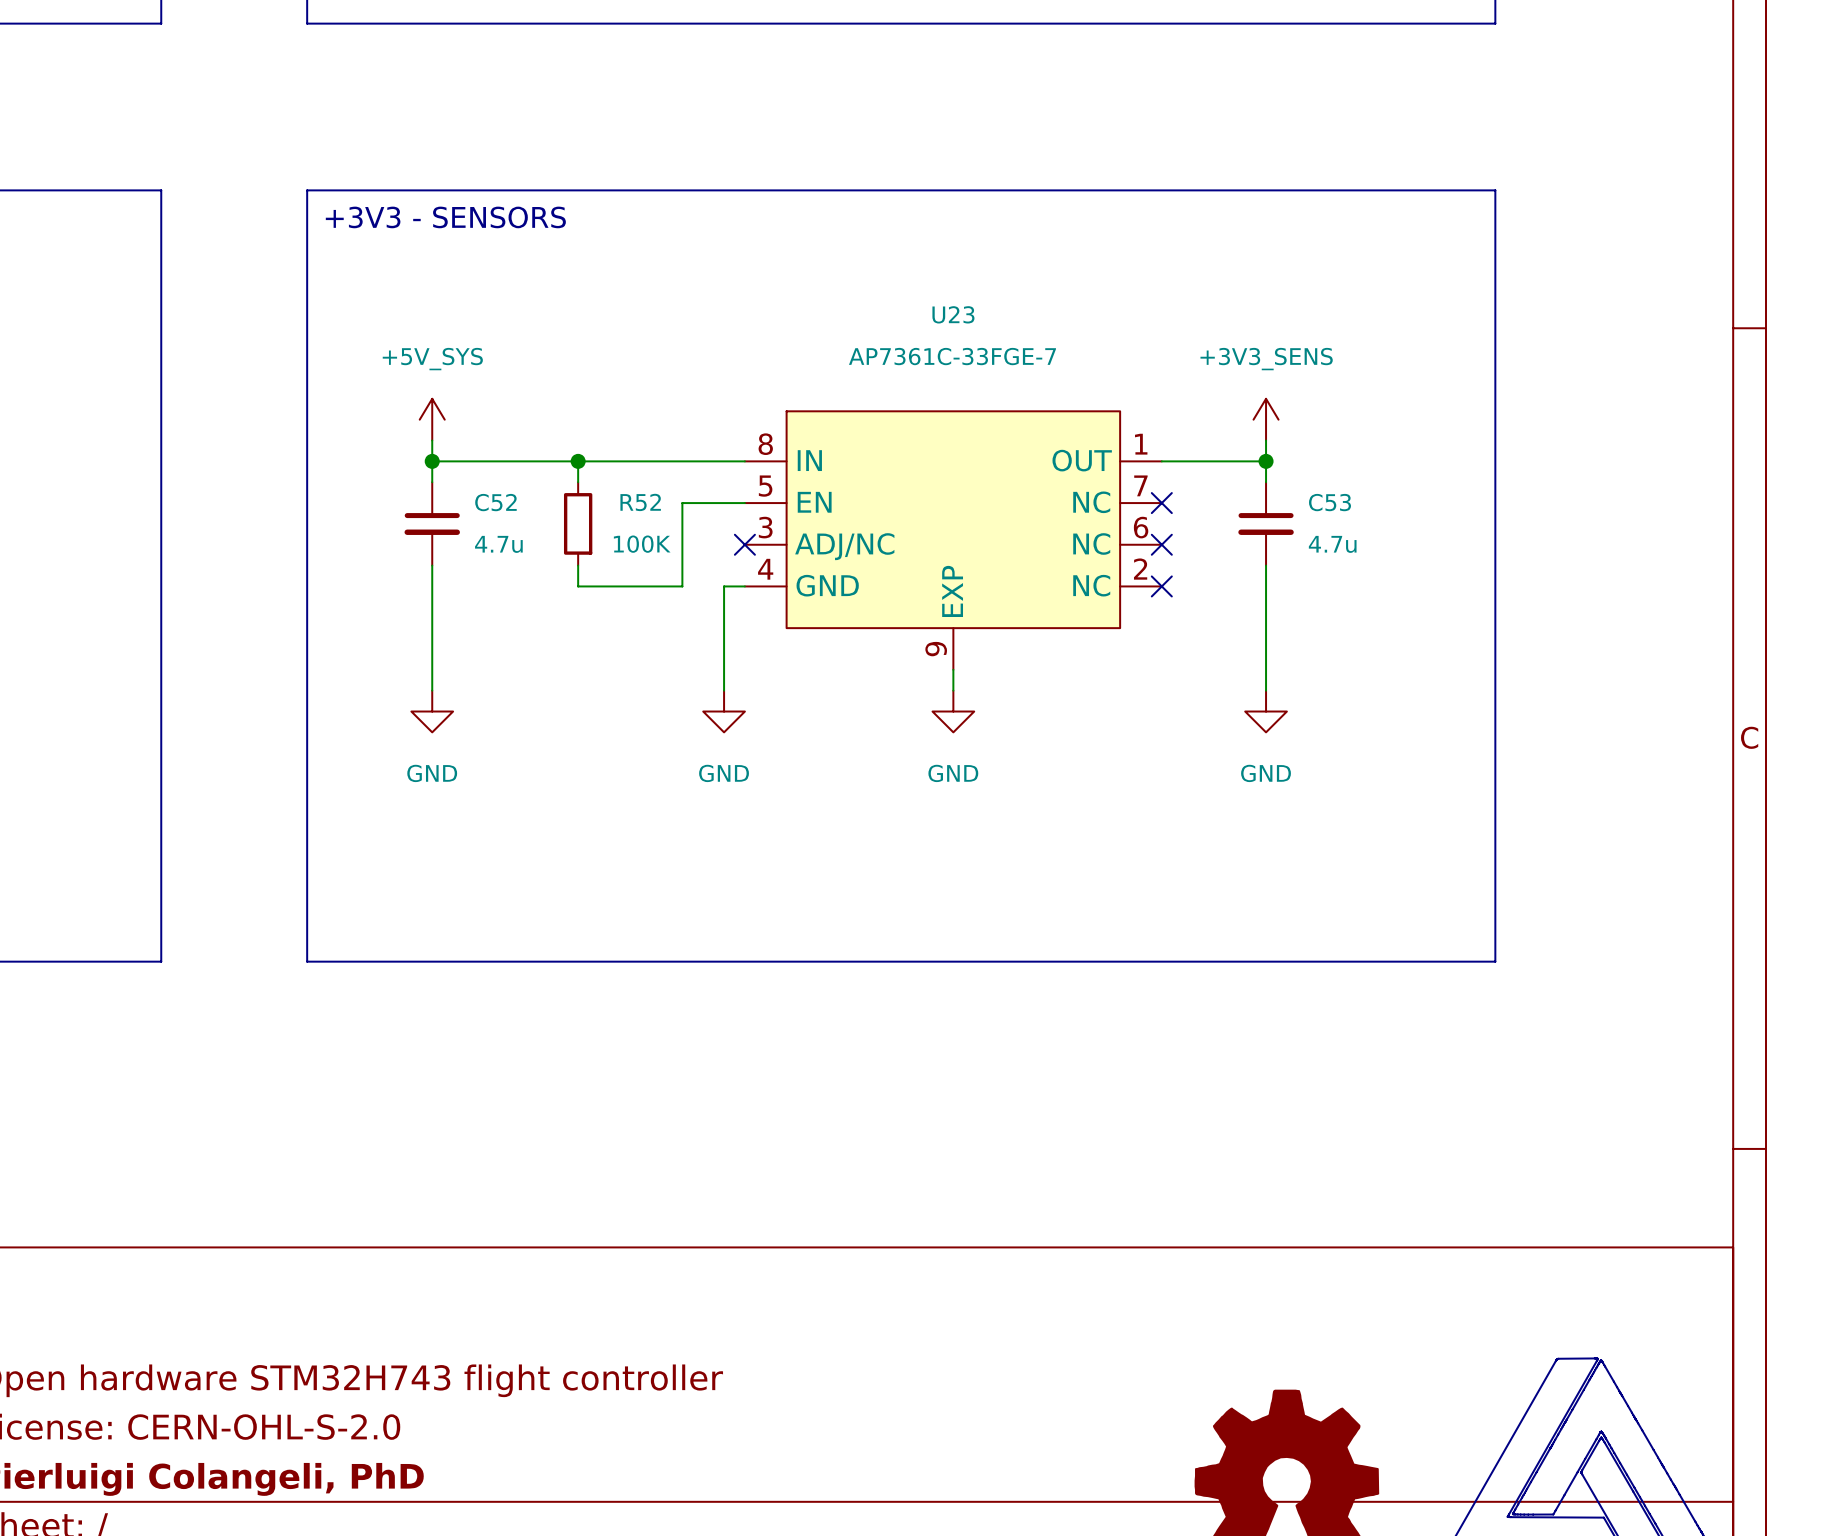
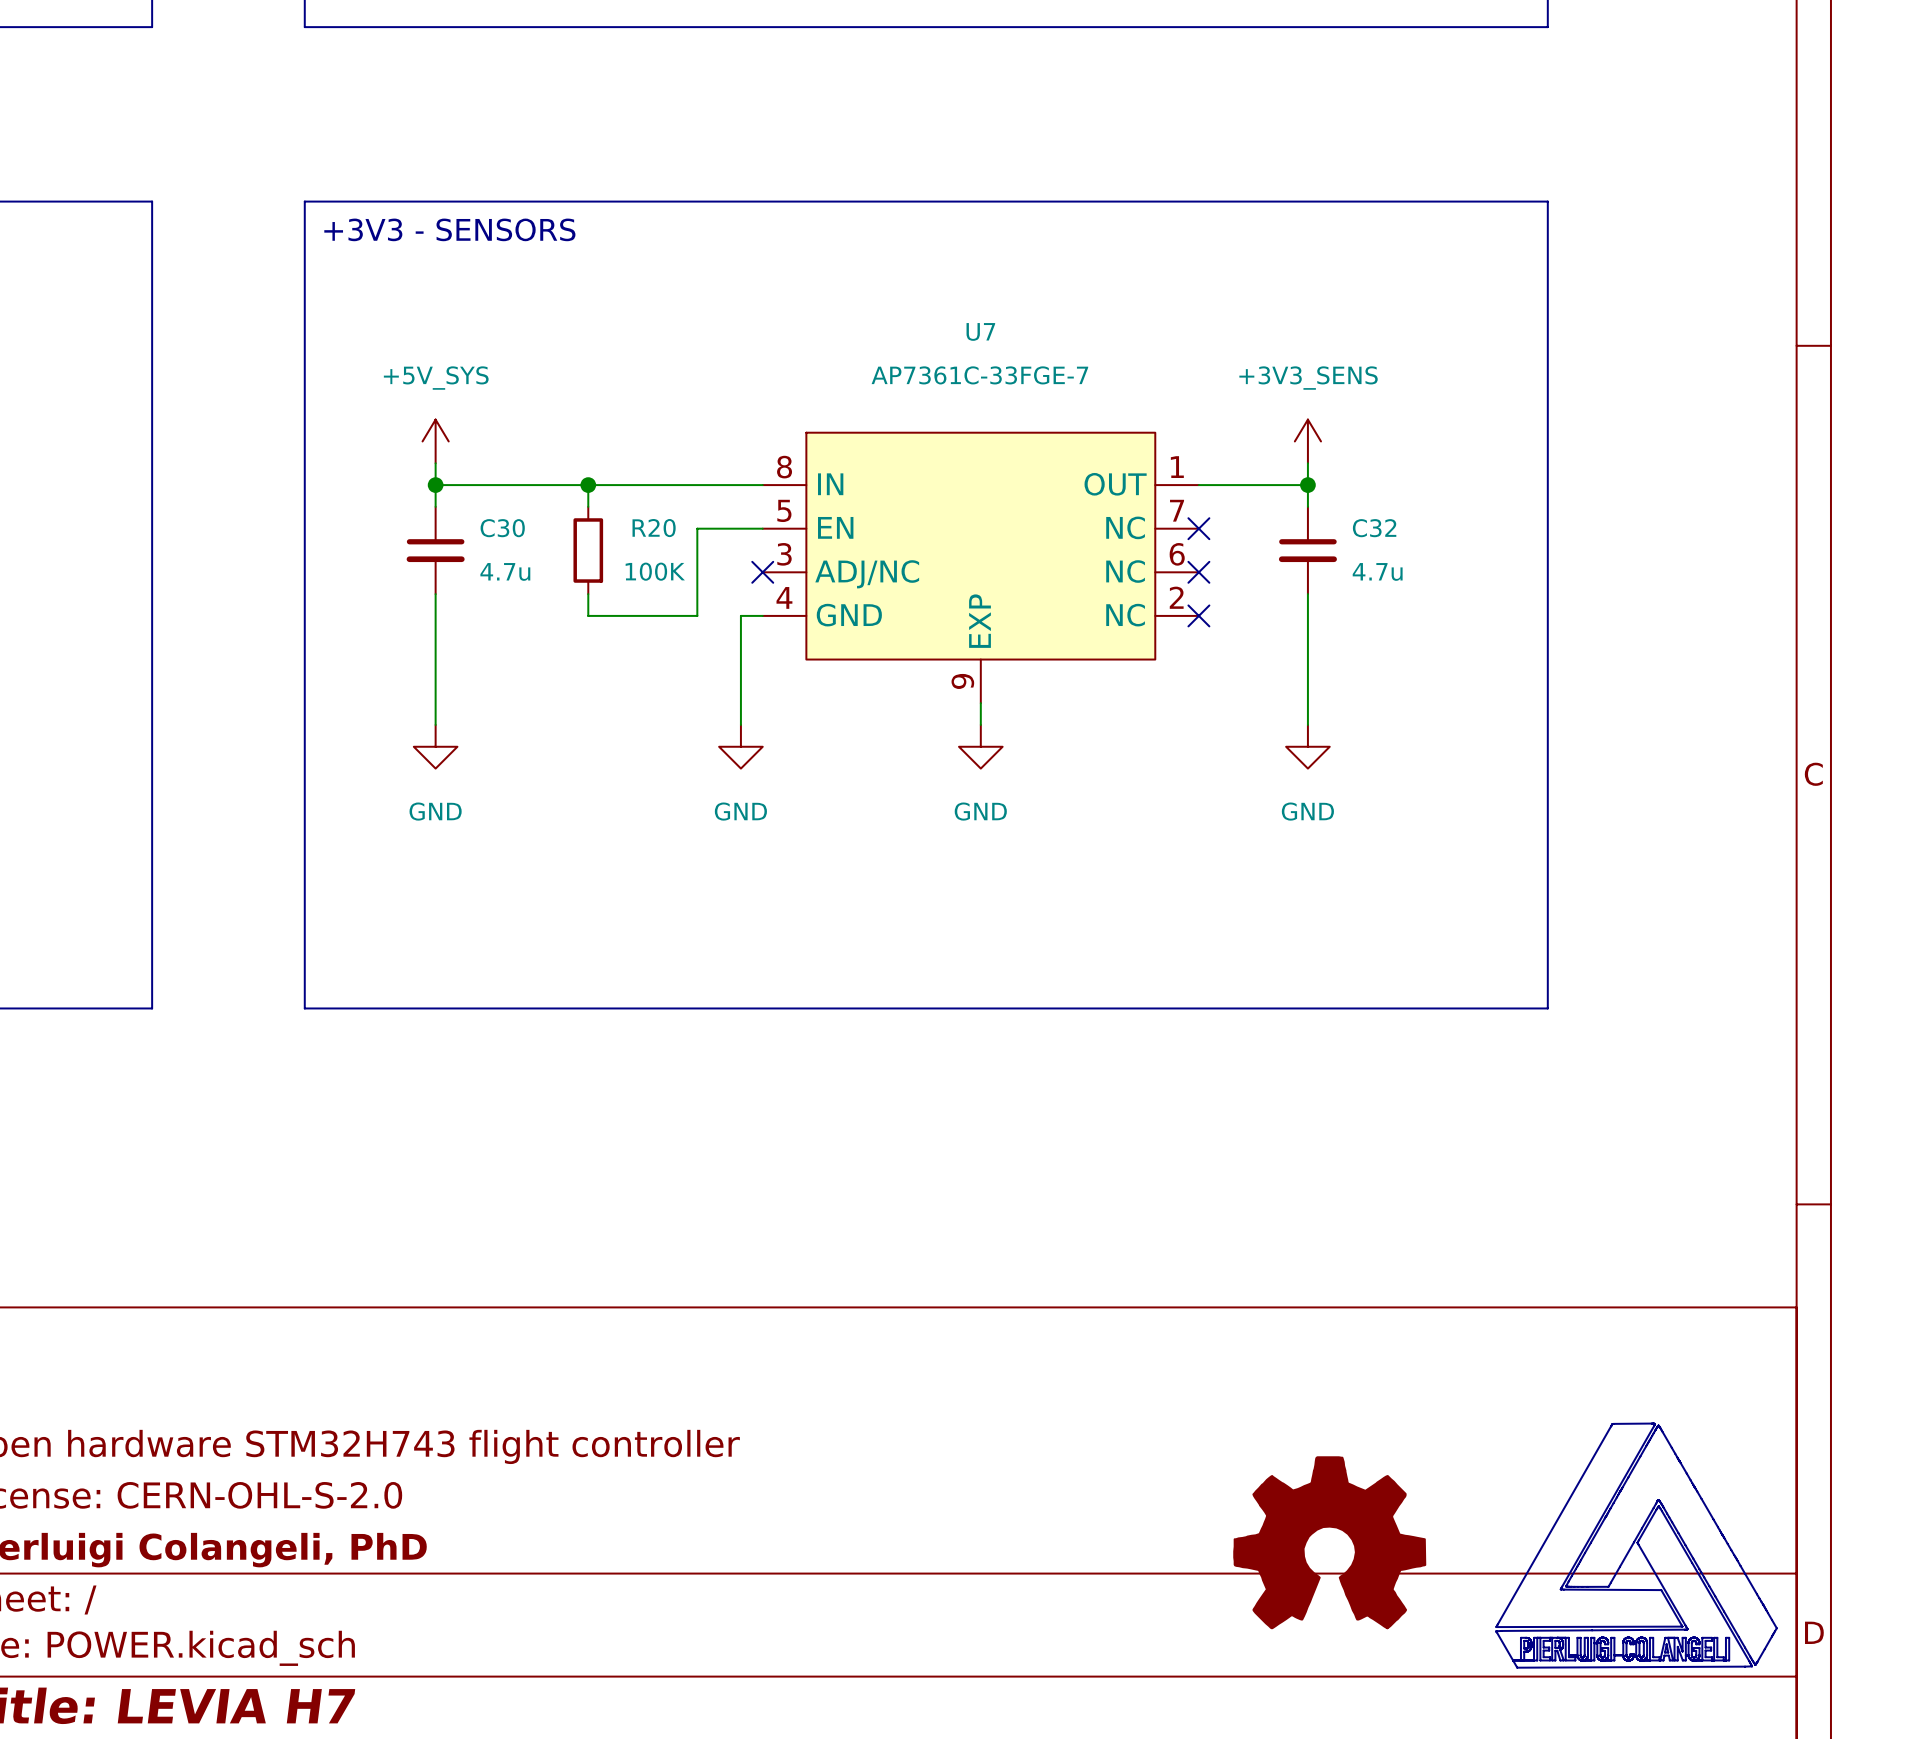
U23 name: U23 (953, 314) -> U7 (980, 331)
C52 name: C52 (495, 502) -> C30 (502, 528)
R52 name: R52 (640, 502) -> R20 (654, 528)
C53 name: C53 (1330, 502) -> C32 (1374, 528)

